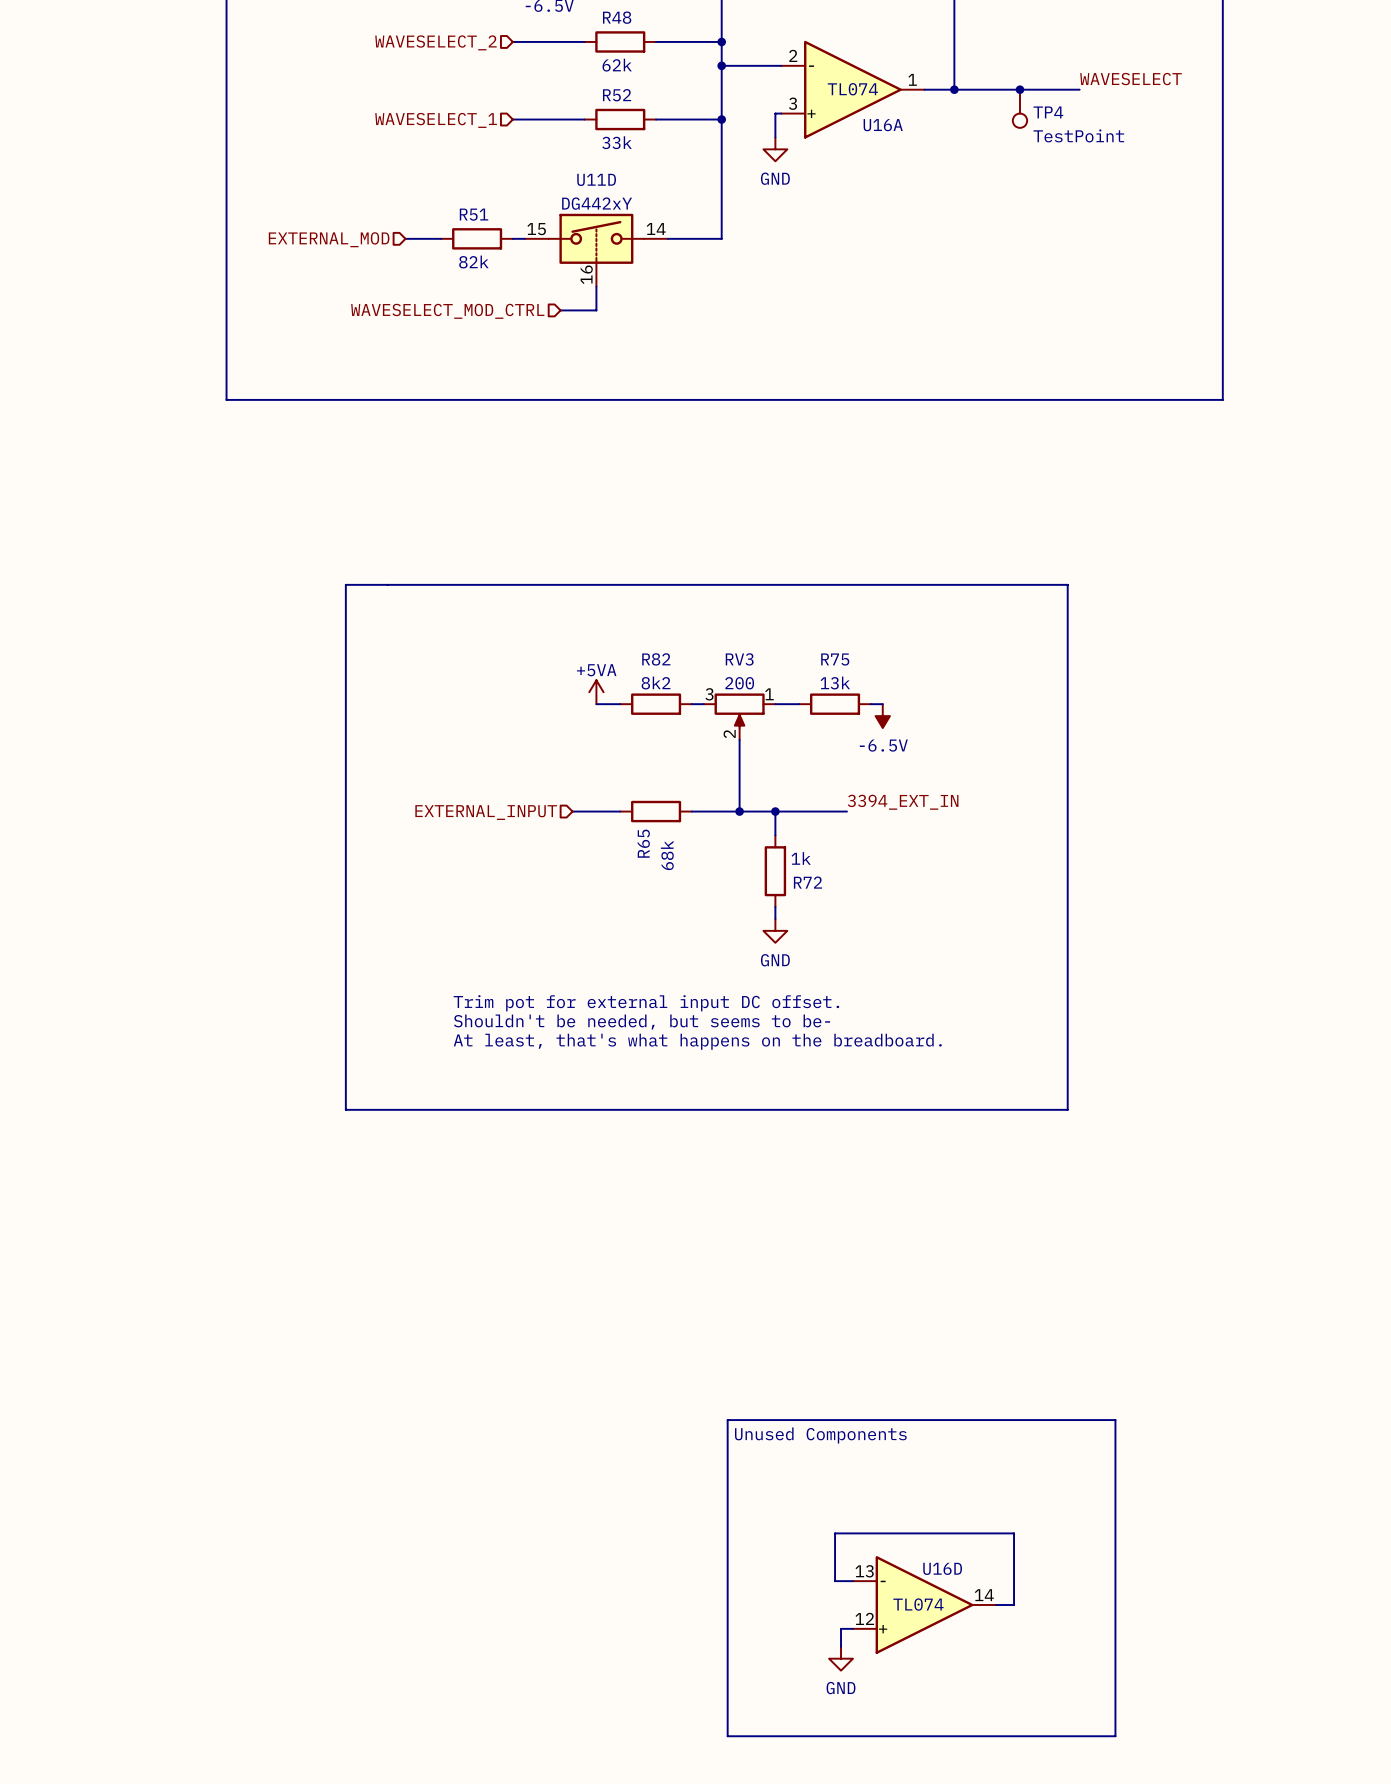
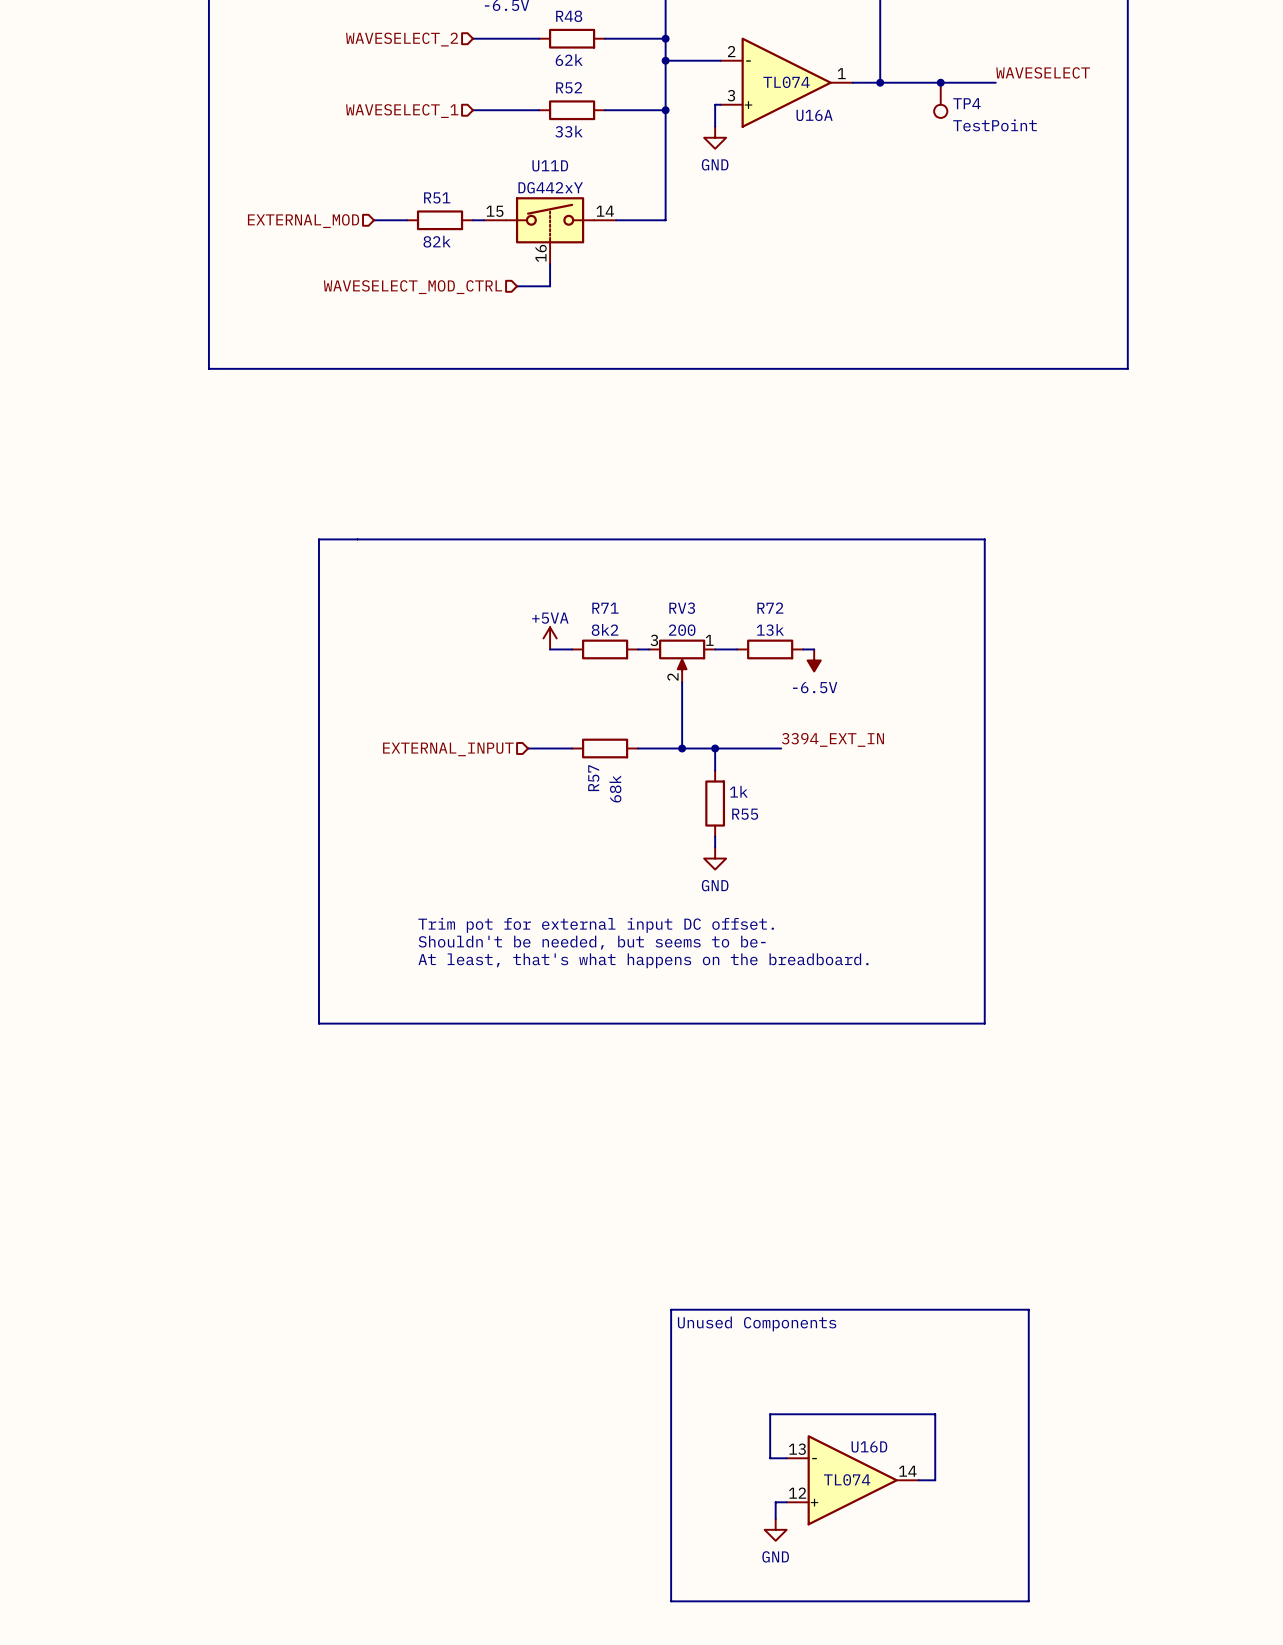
R82 name: R82 (656, 659) -> R71 (605, 608)
R75 name: R75 (835, 659) -> R72 (770, 608)
R65 name: R65 (643, 843) -> R57 (593, 778)
R72 name: R72 (807, 882) -> R55 (745, 814)

